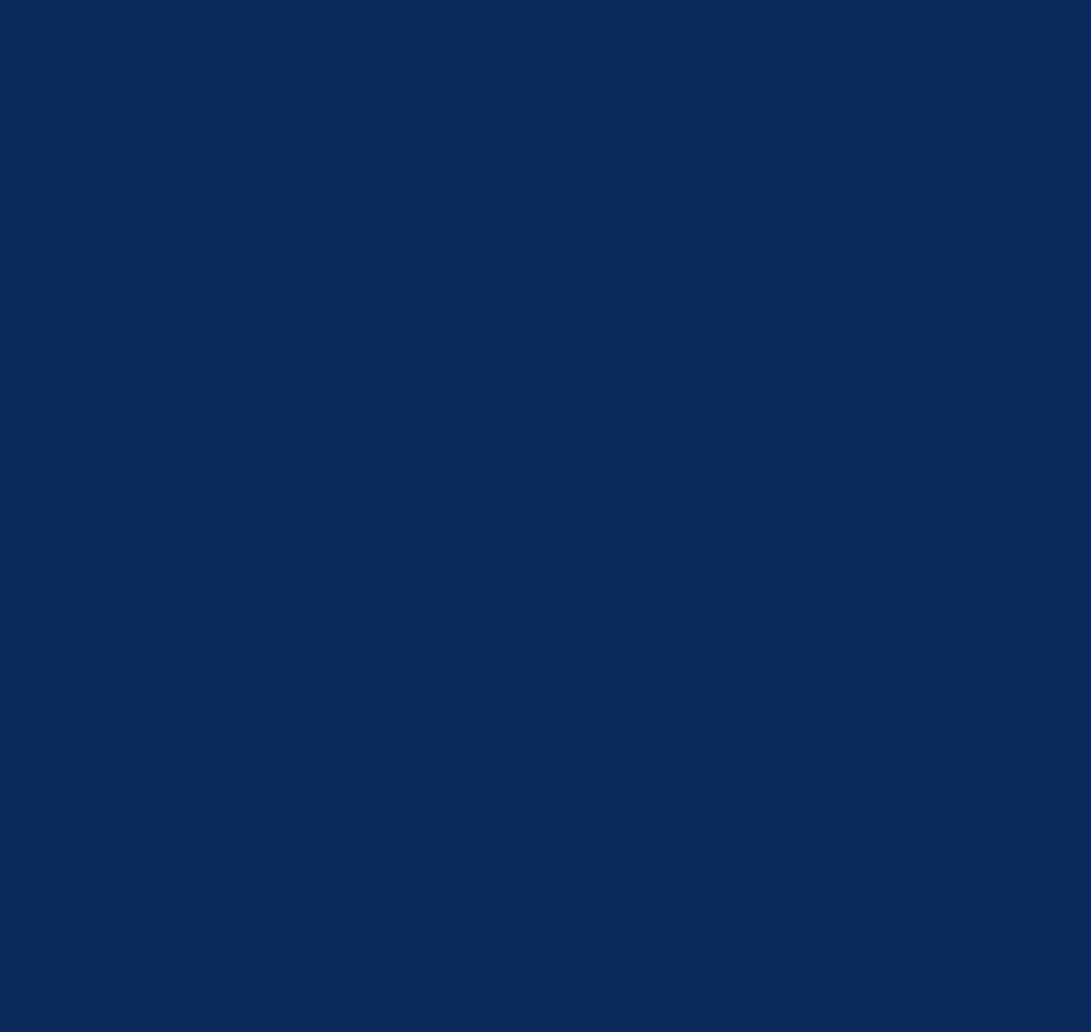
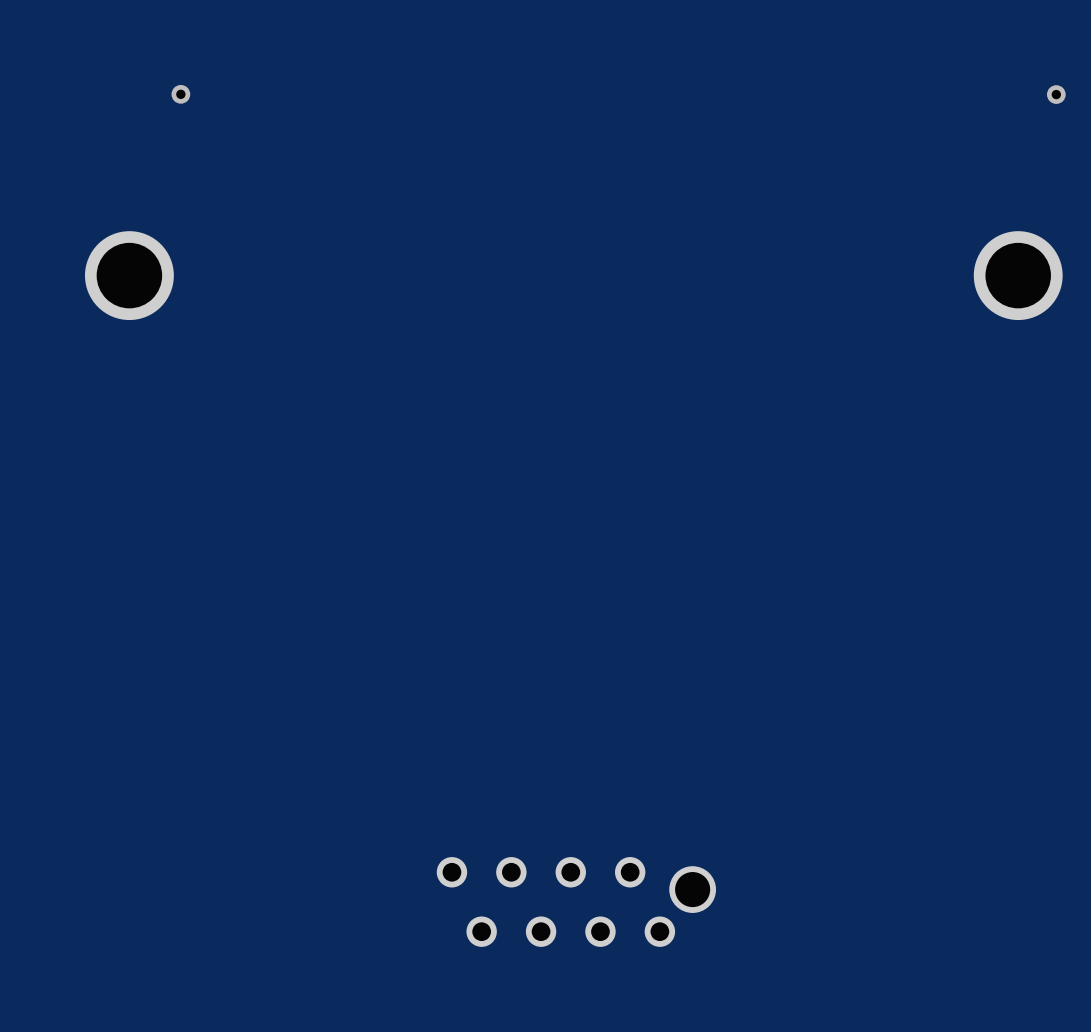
via: none -> (180, 94)
via: none -> (1056, 94)
part: none -> (129, 275)
part: none -> (1018, 275)
part: none -> (576, 901)

